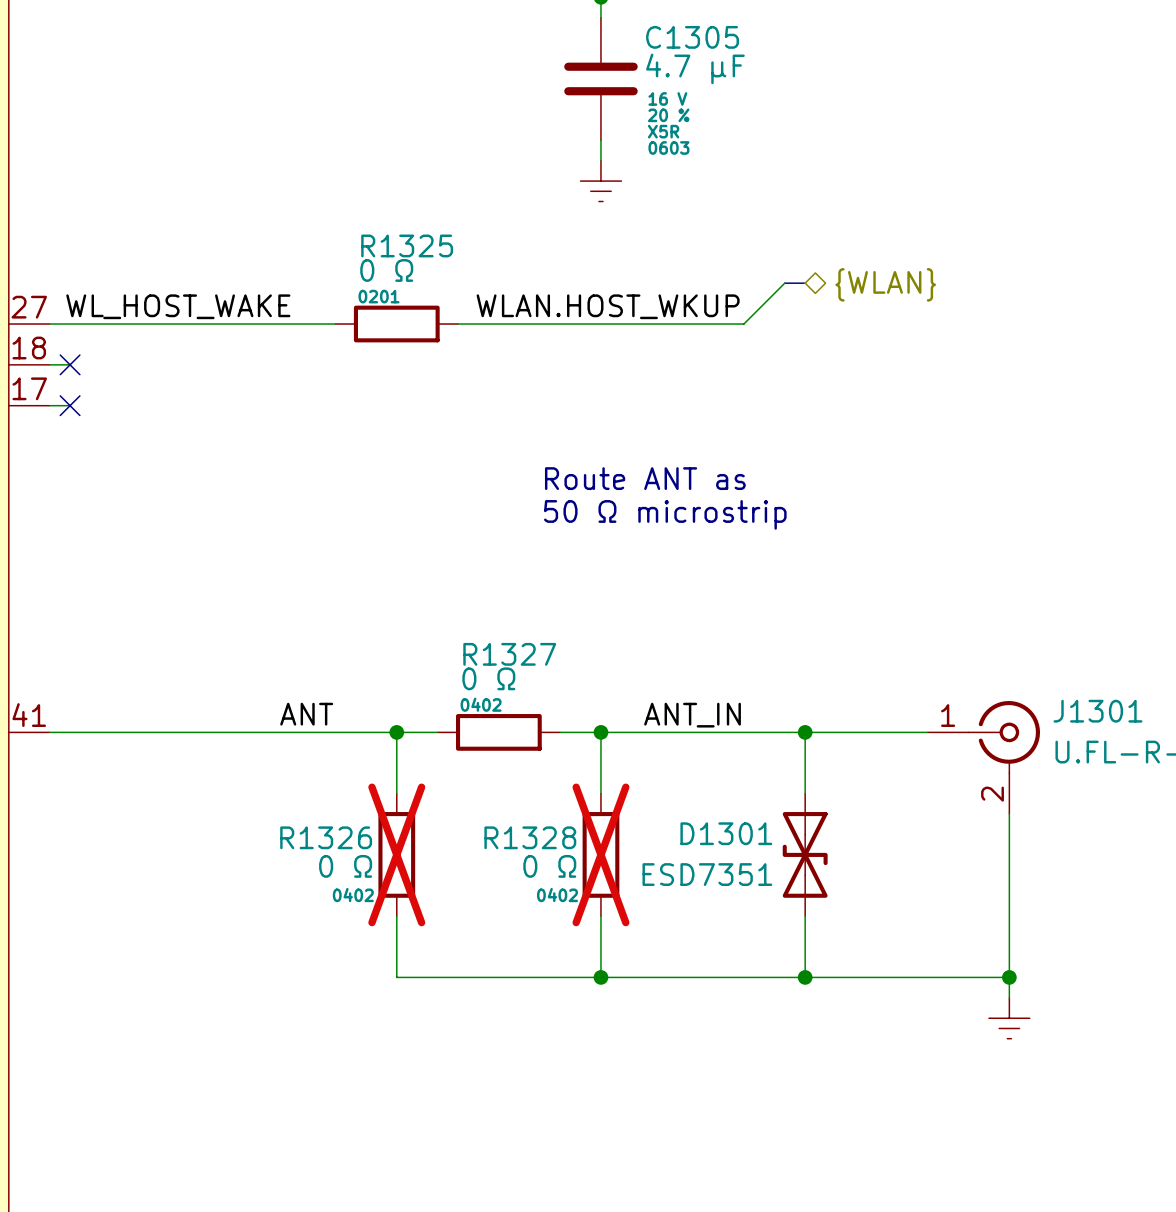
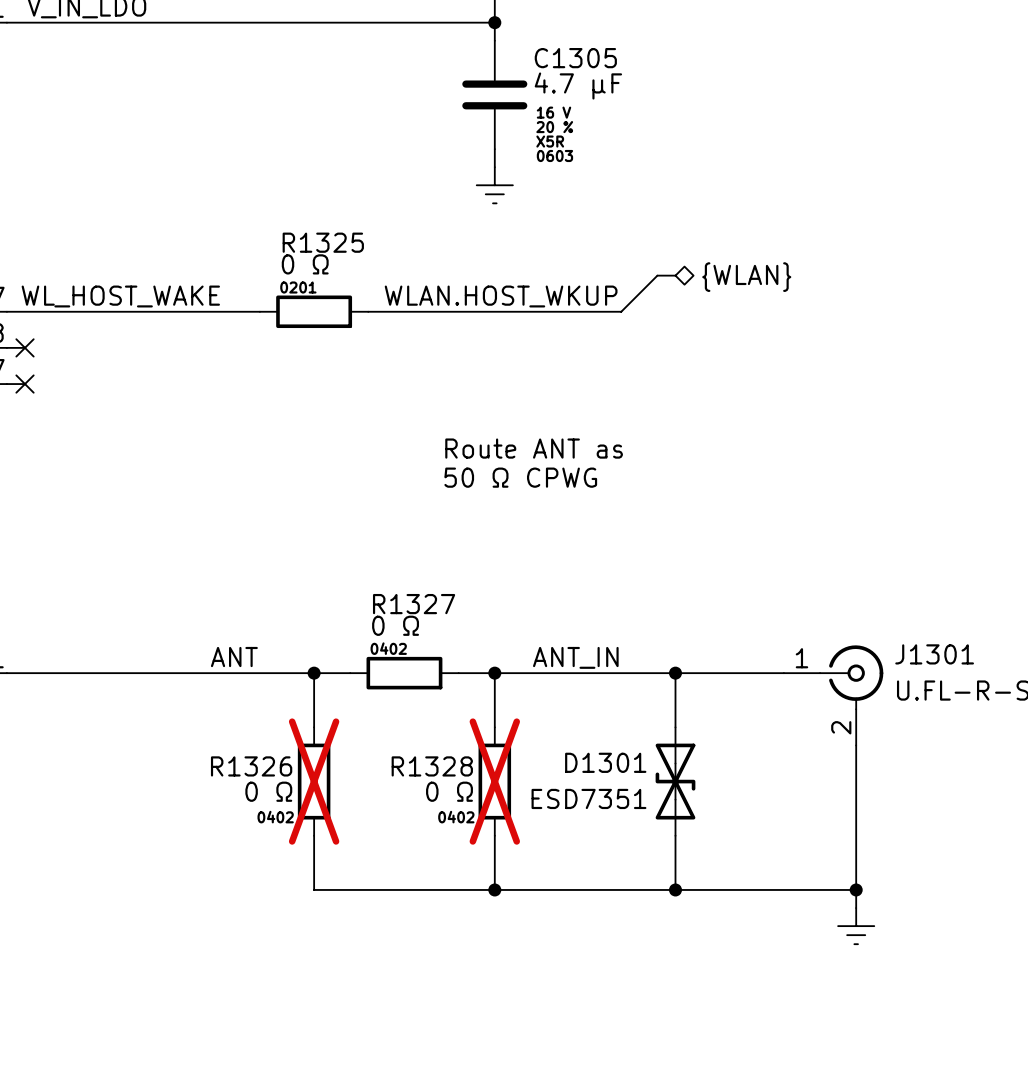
text: 50 Ω microstrip (665, 514) -> 50 Ω CPWG (520, 477)

